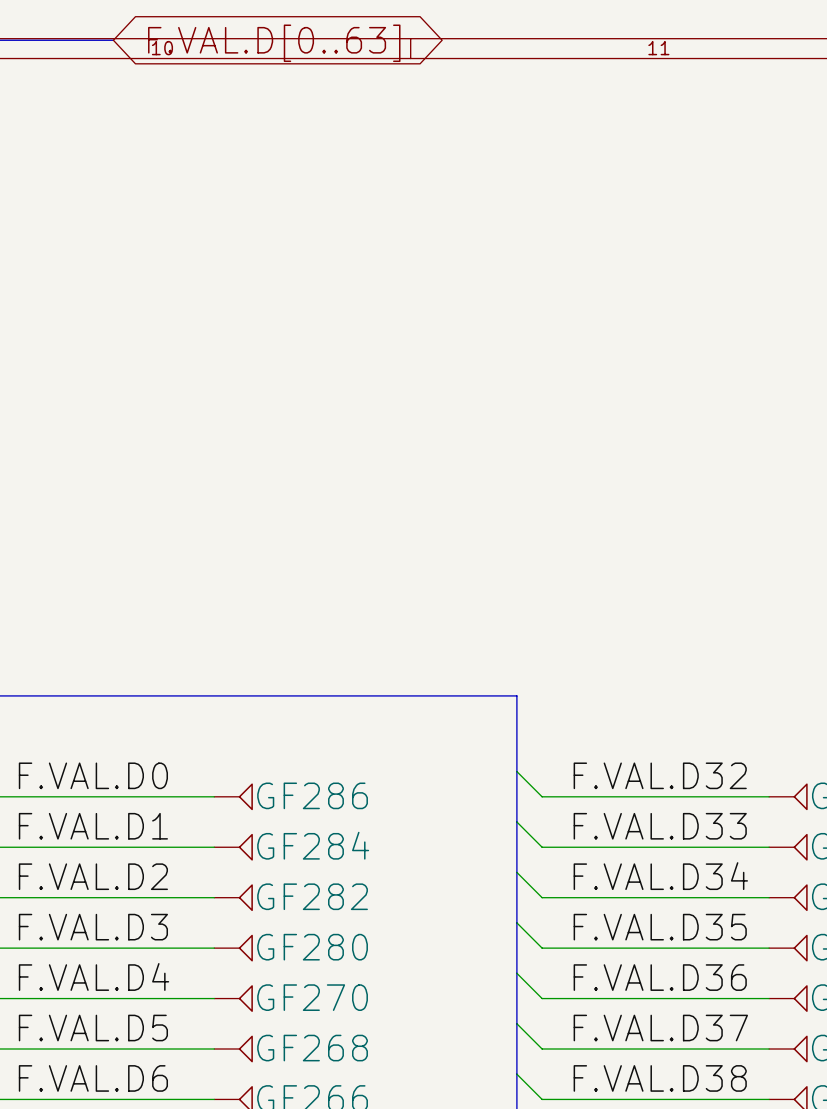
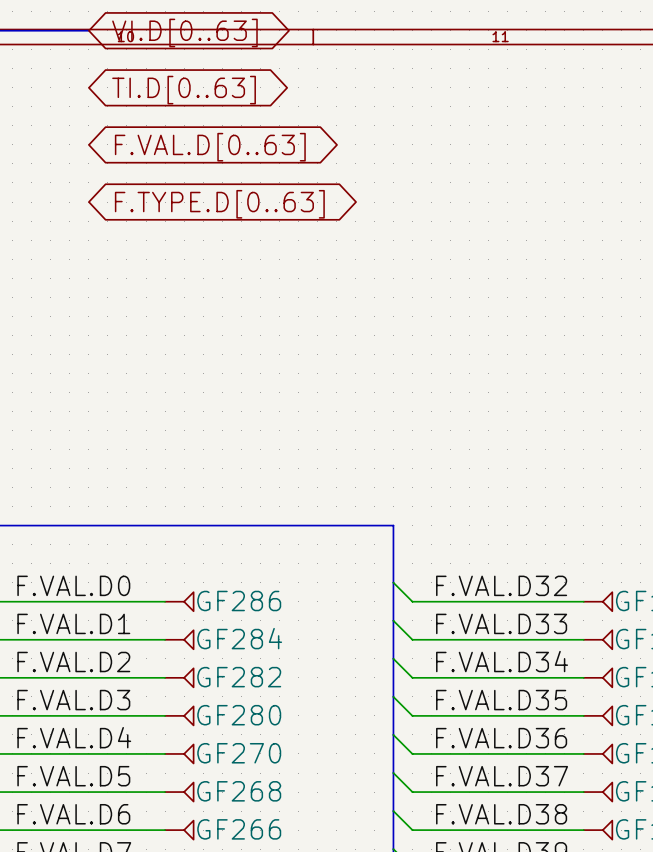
global label: F.VAL.D[0..63] (274, 43) -> VI.D[0..63] (184, 32)
global label: none -> TI.D[0..63] (184, 90)
global label: none -> F.VAL.D[0..63] (210, 147)
global label: none -> F.TYPE.D[0..63] (219, 204)

